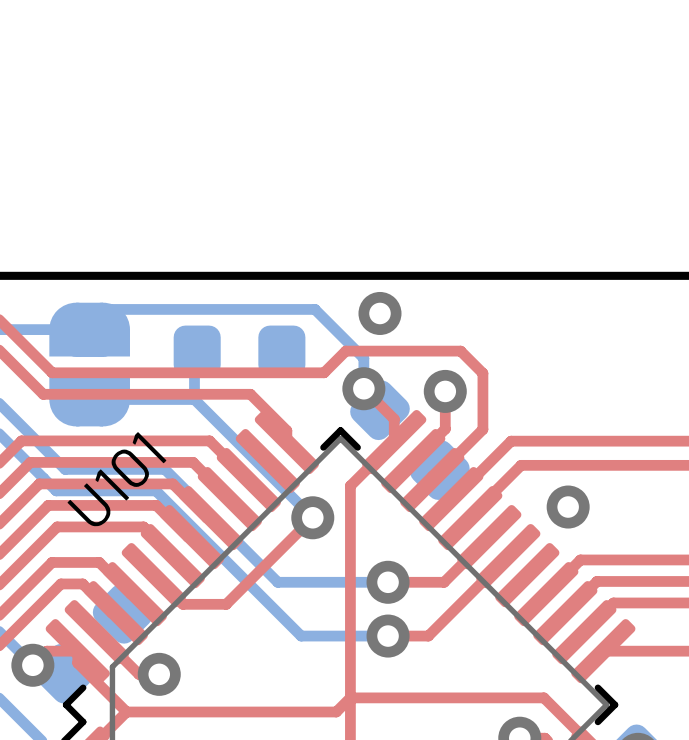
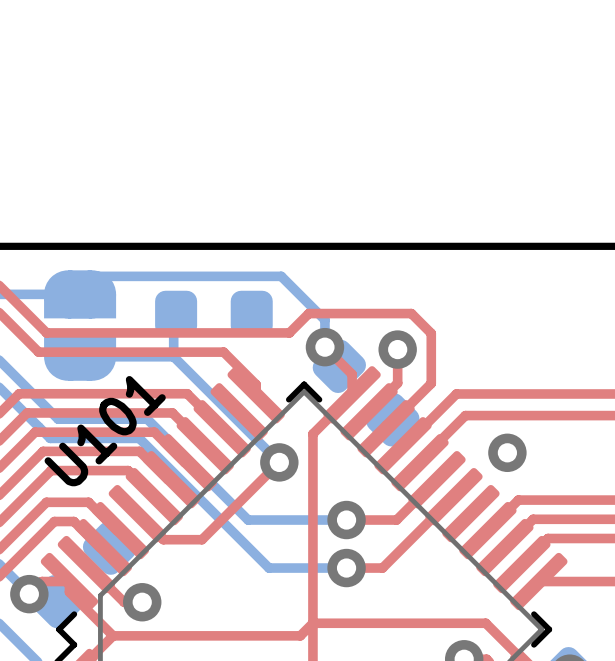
via: (379, 313) -> none

